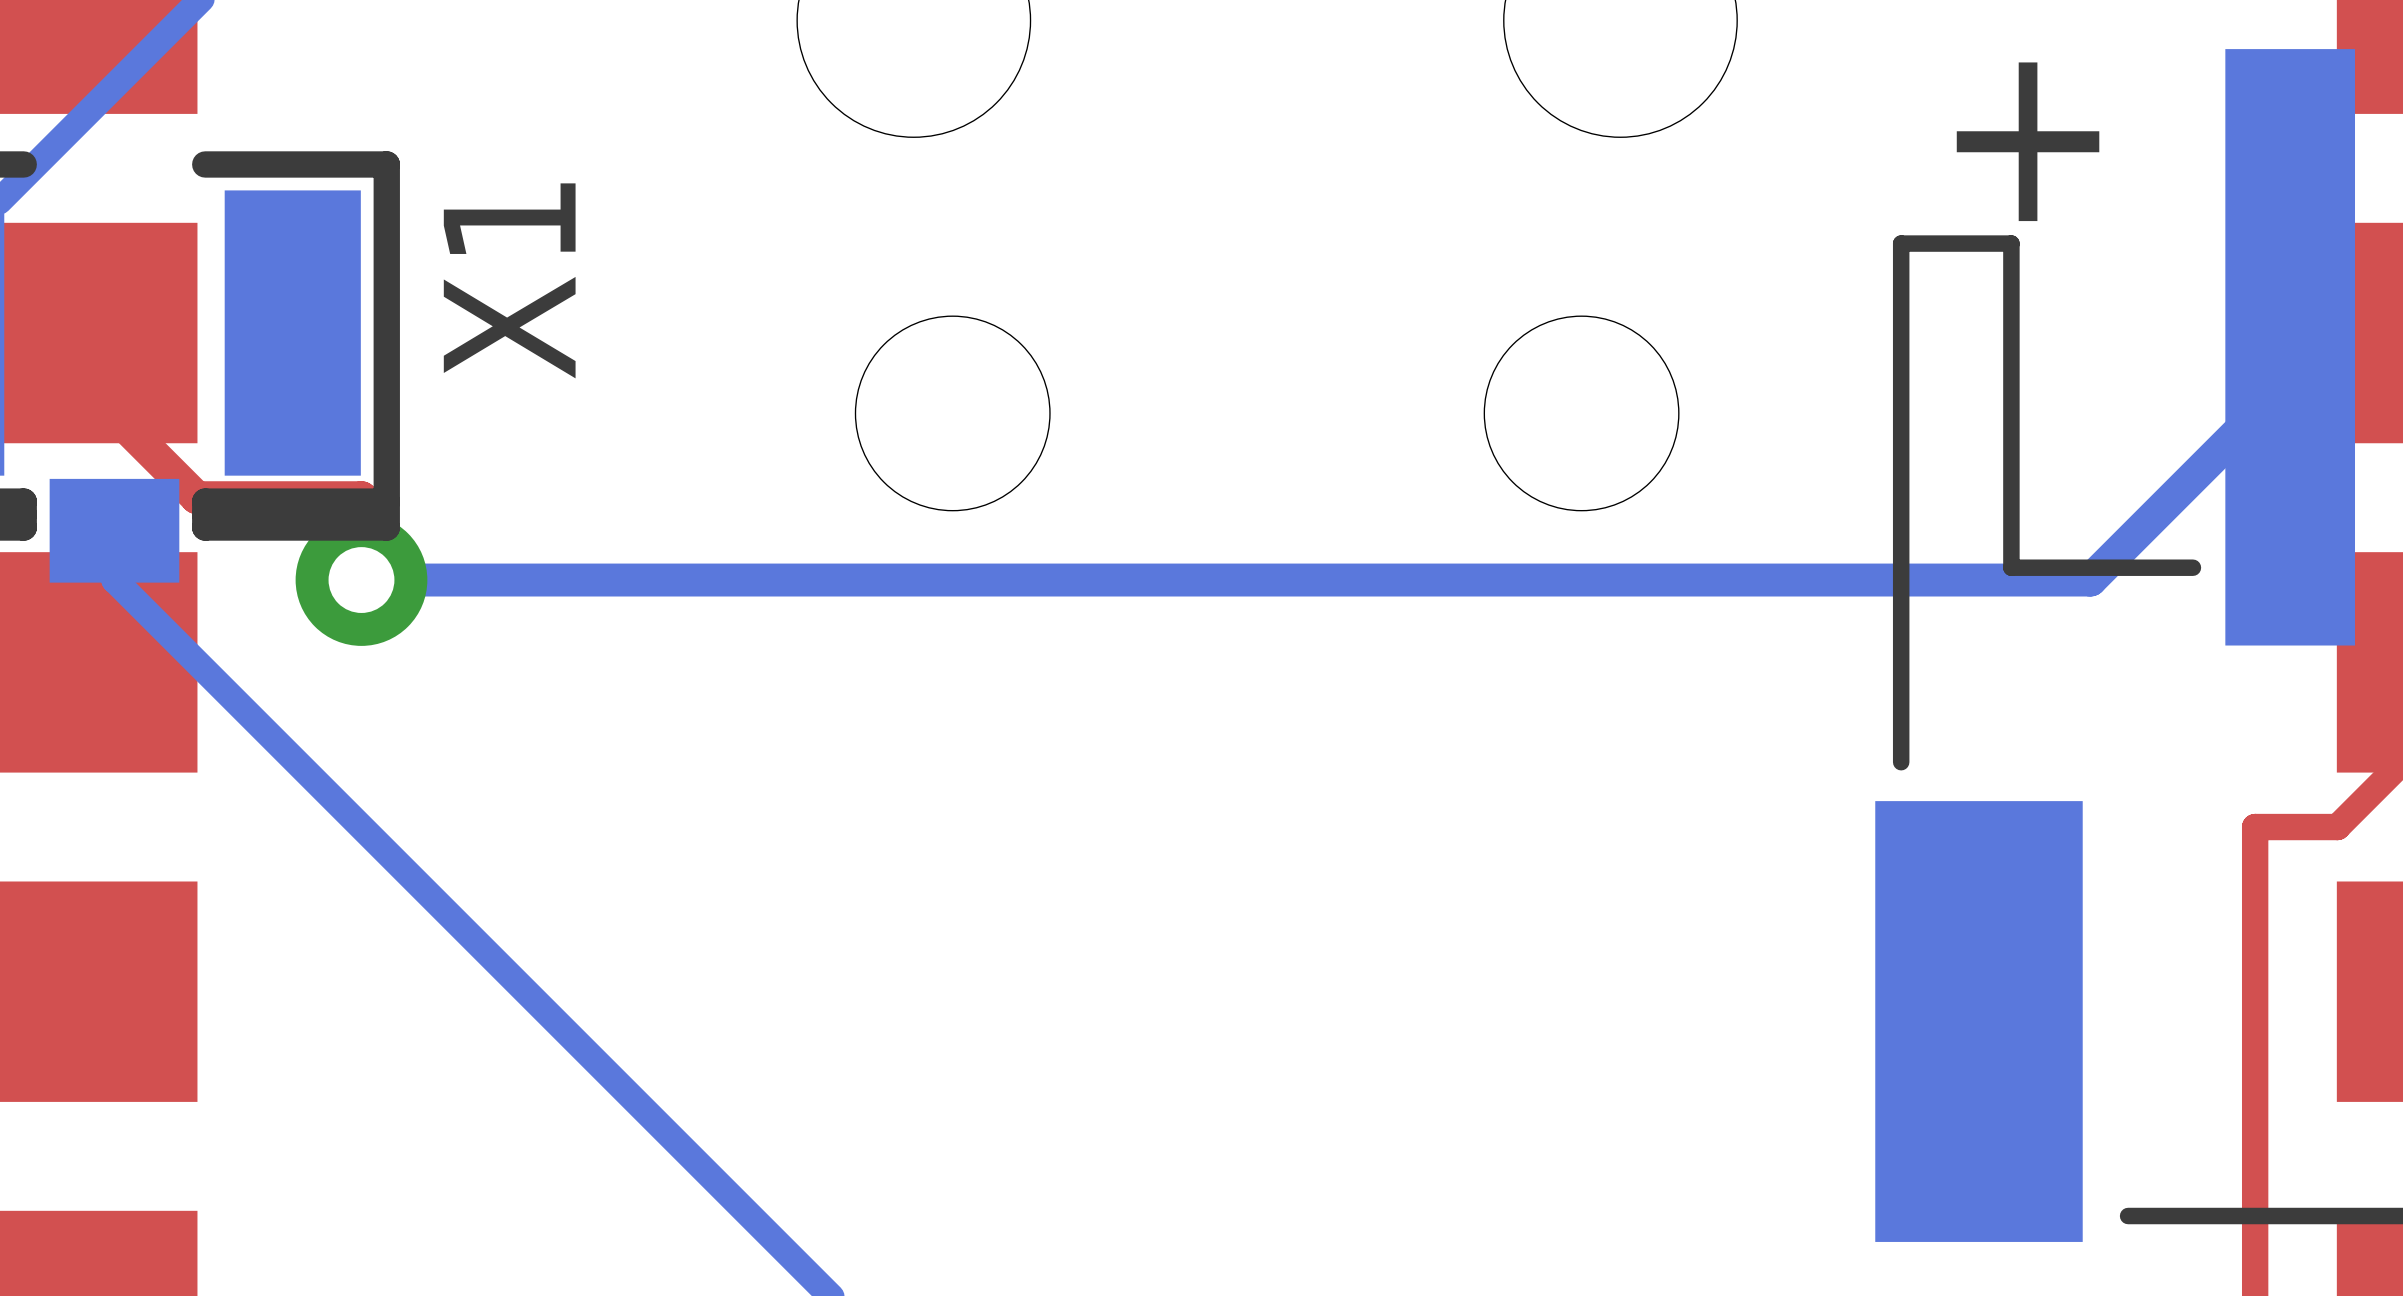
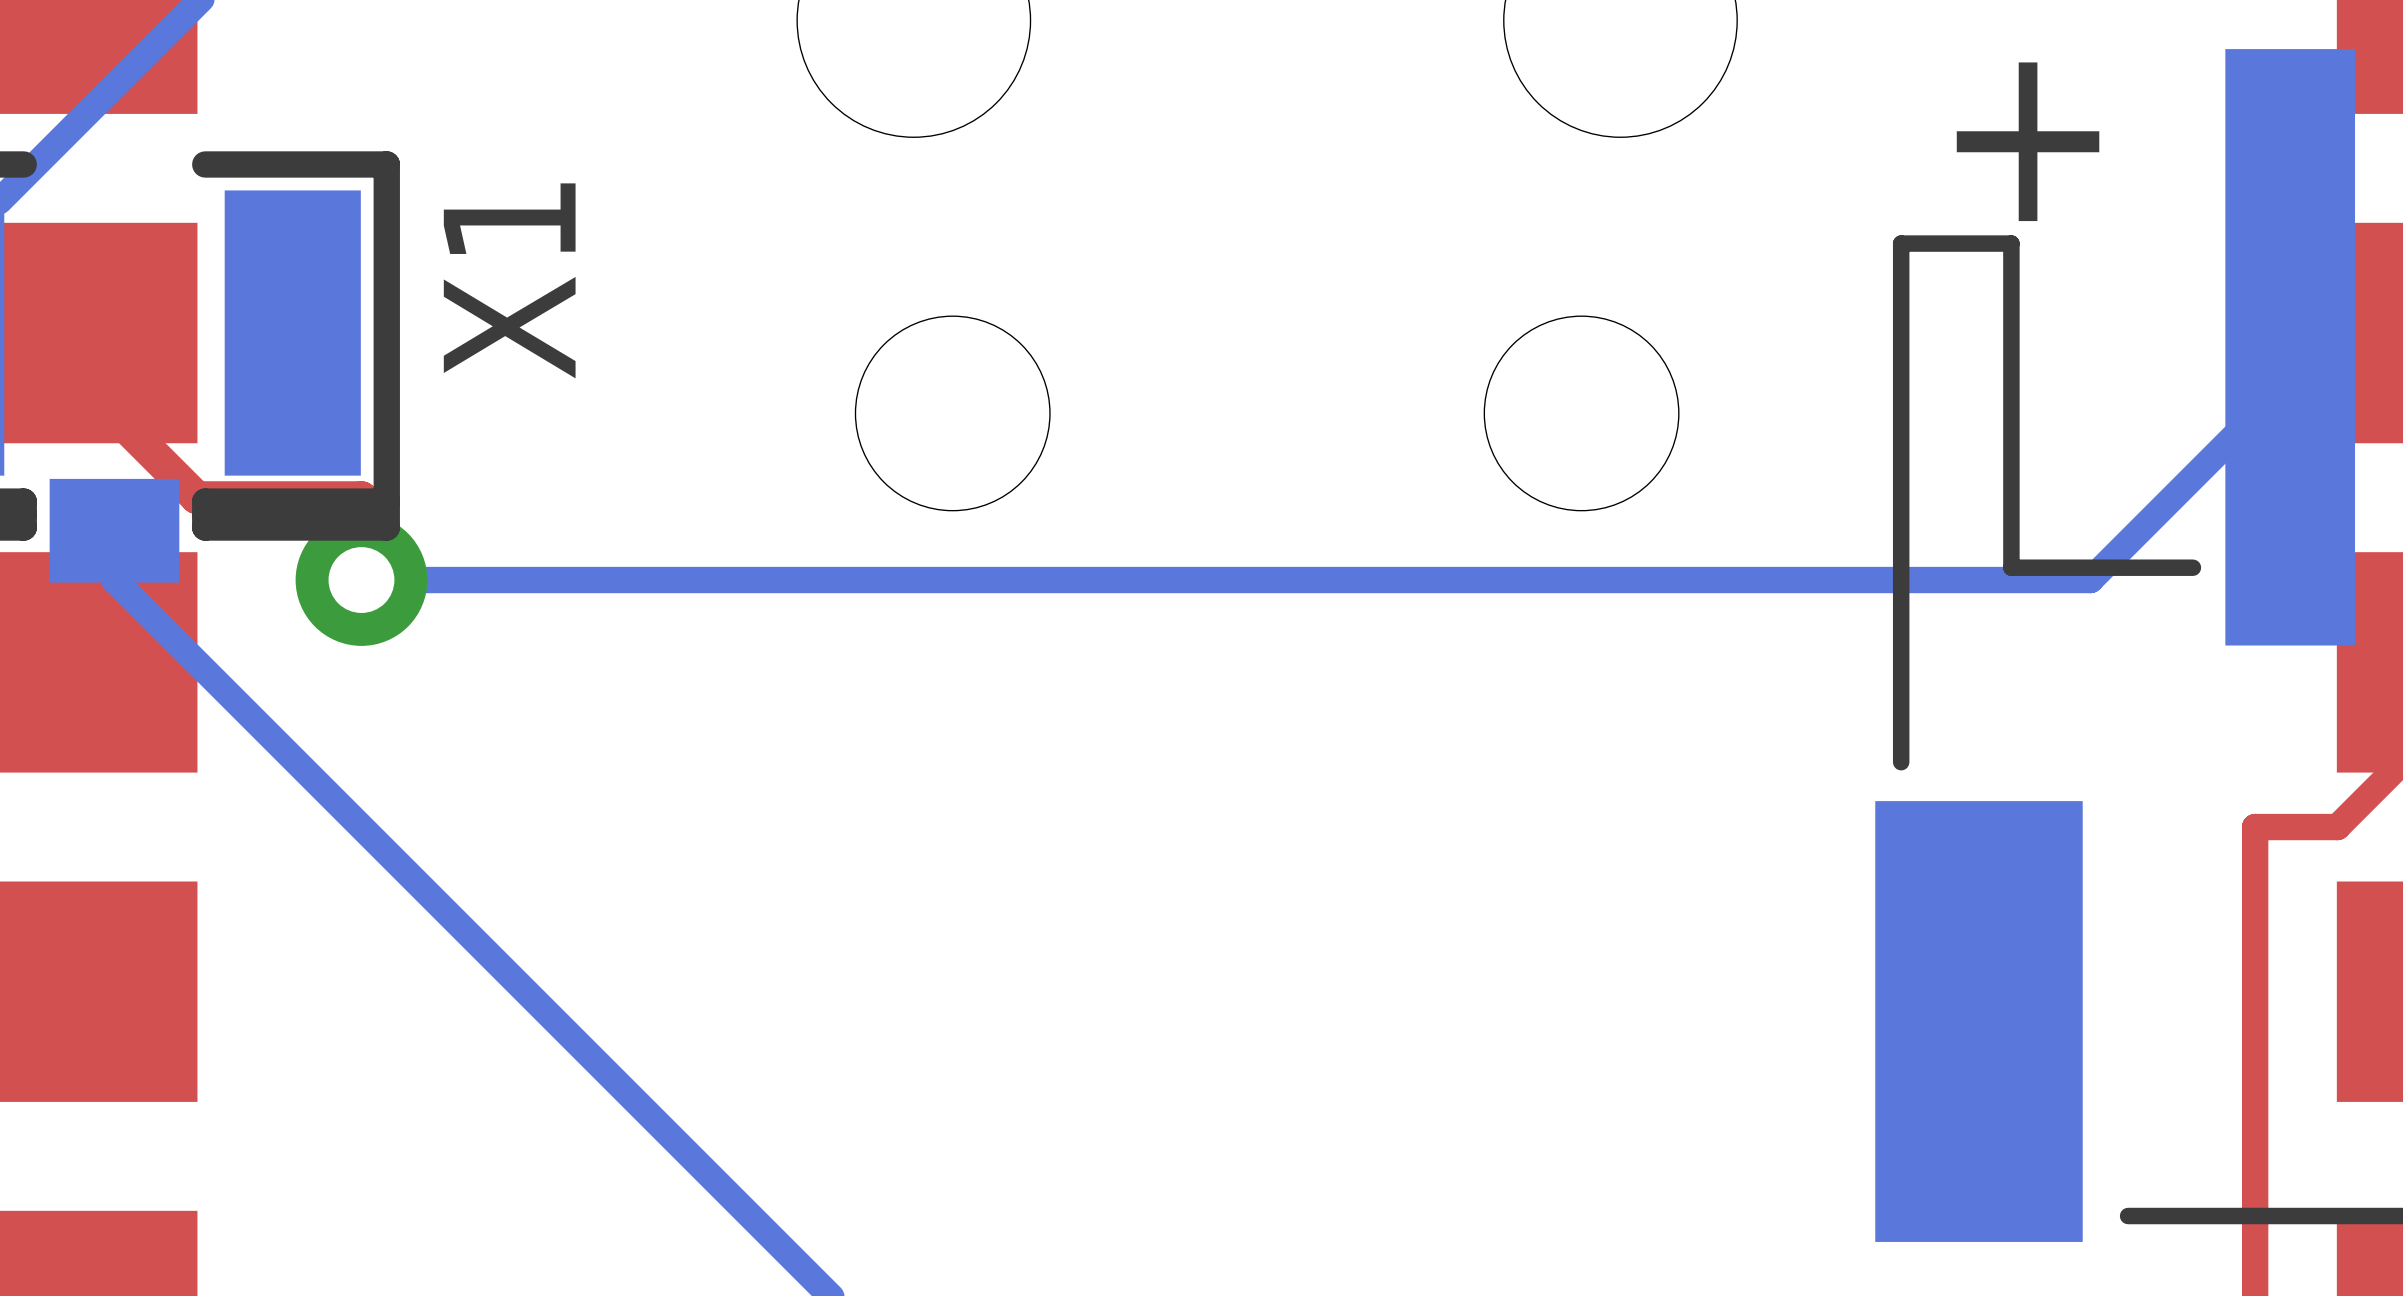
bottom track width: thick (2290, 347) (2255, 415) (2090, 580) (361, 580) -> thin (2290, 347) (2255, 415) (2090, 580) (361, 580)

